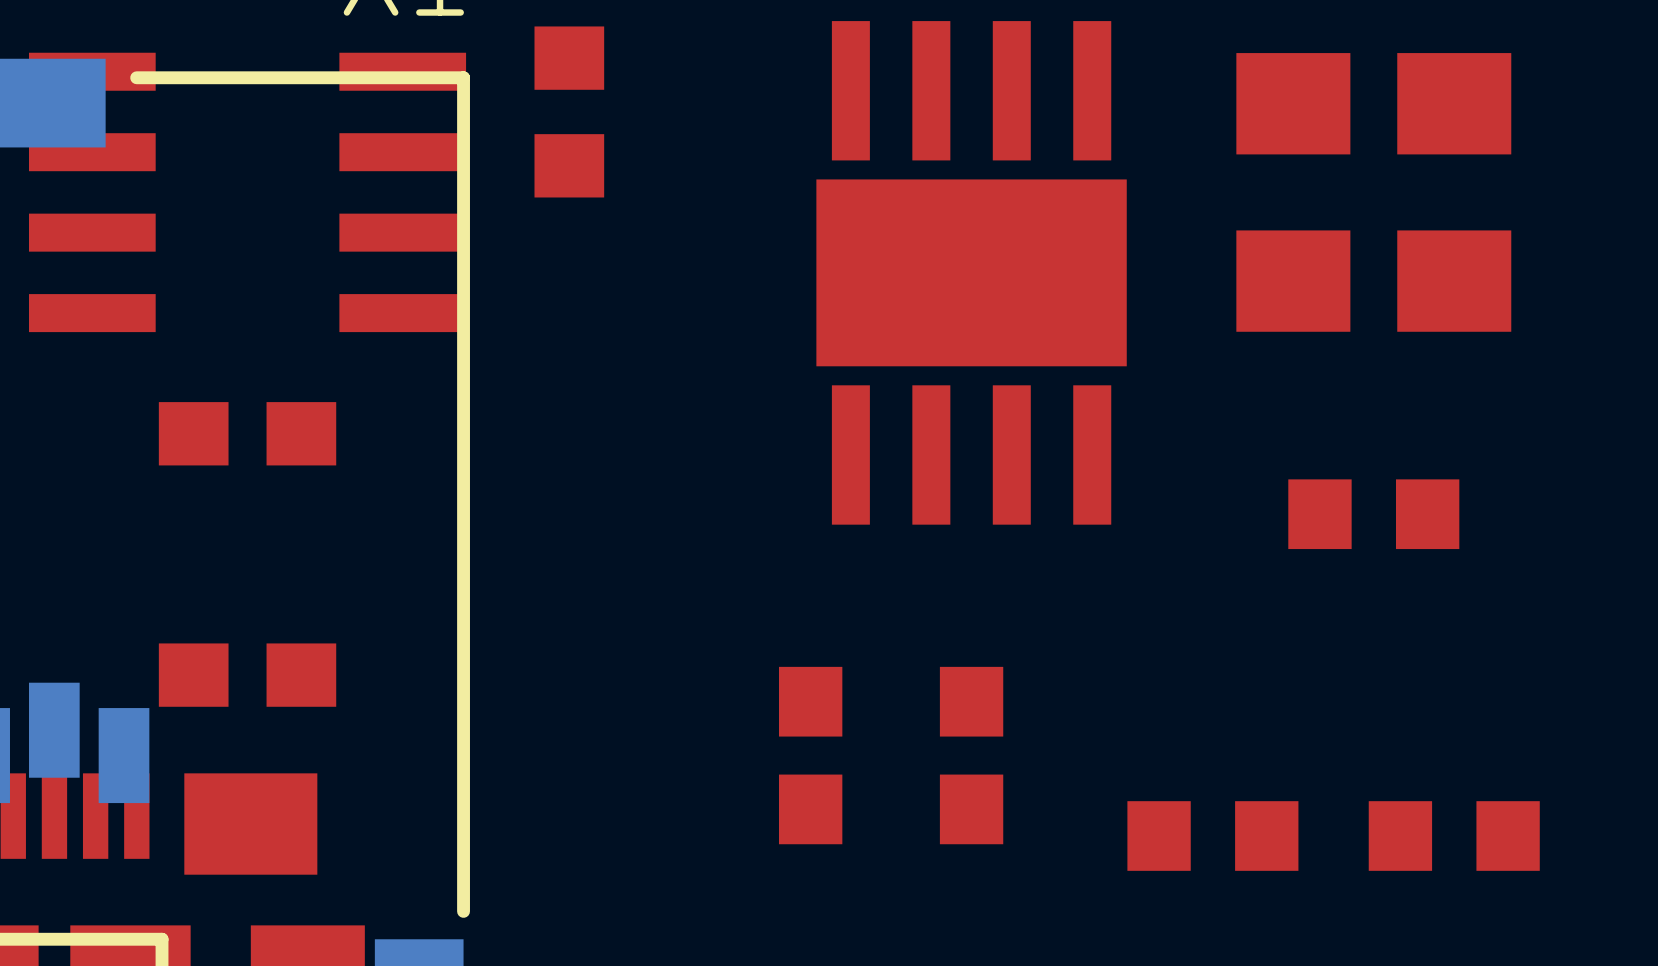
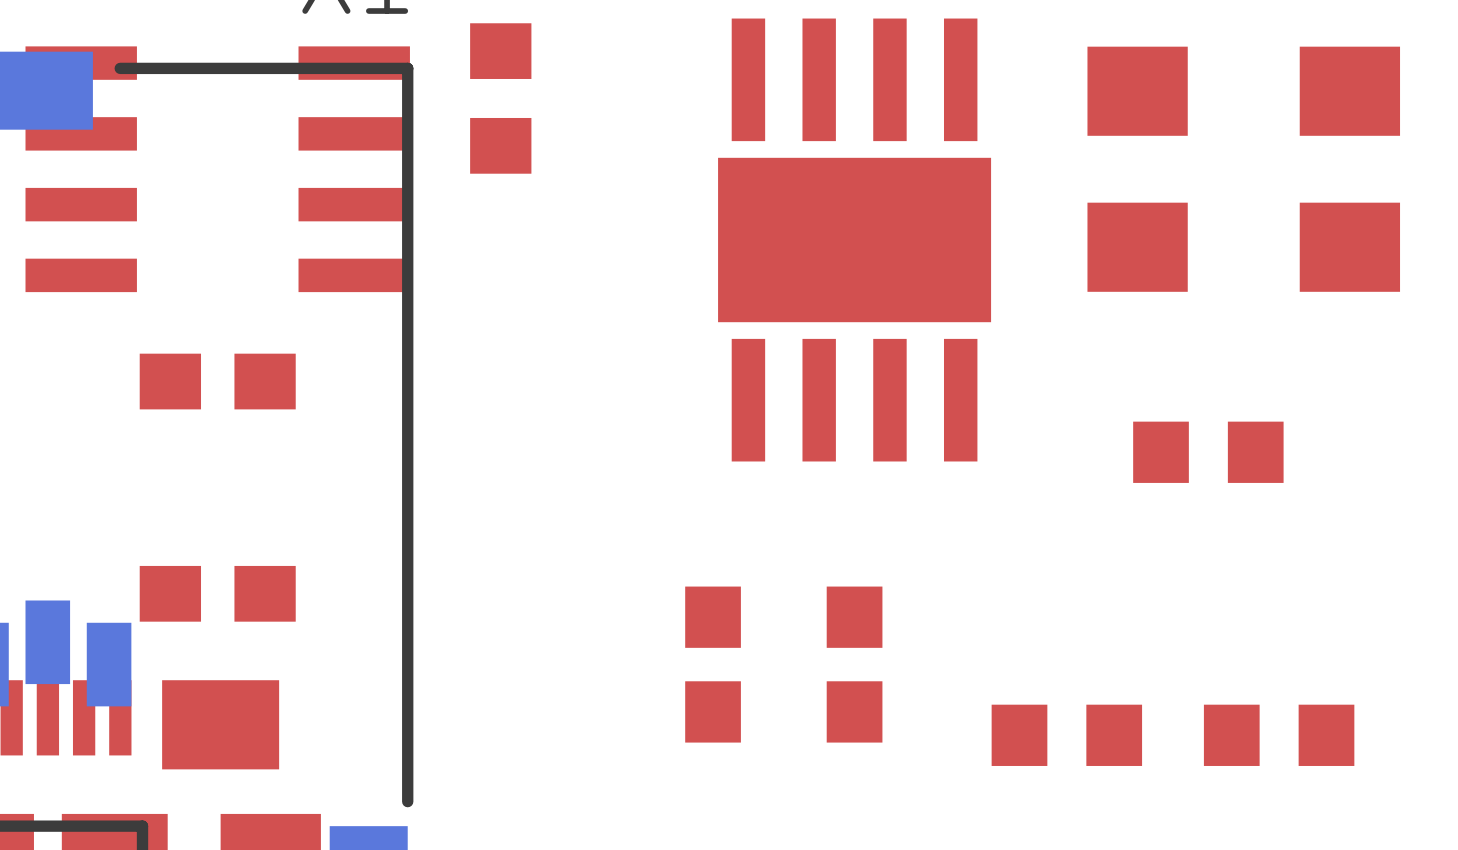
part position: (1454, 192) -> (1349, 169)

